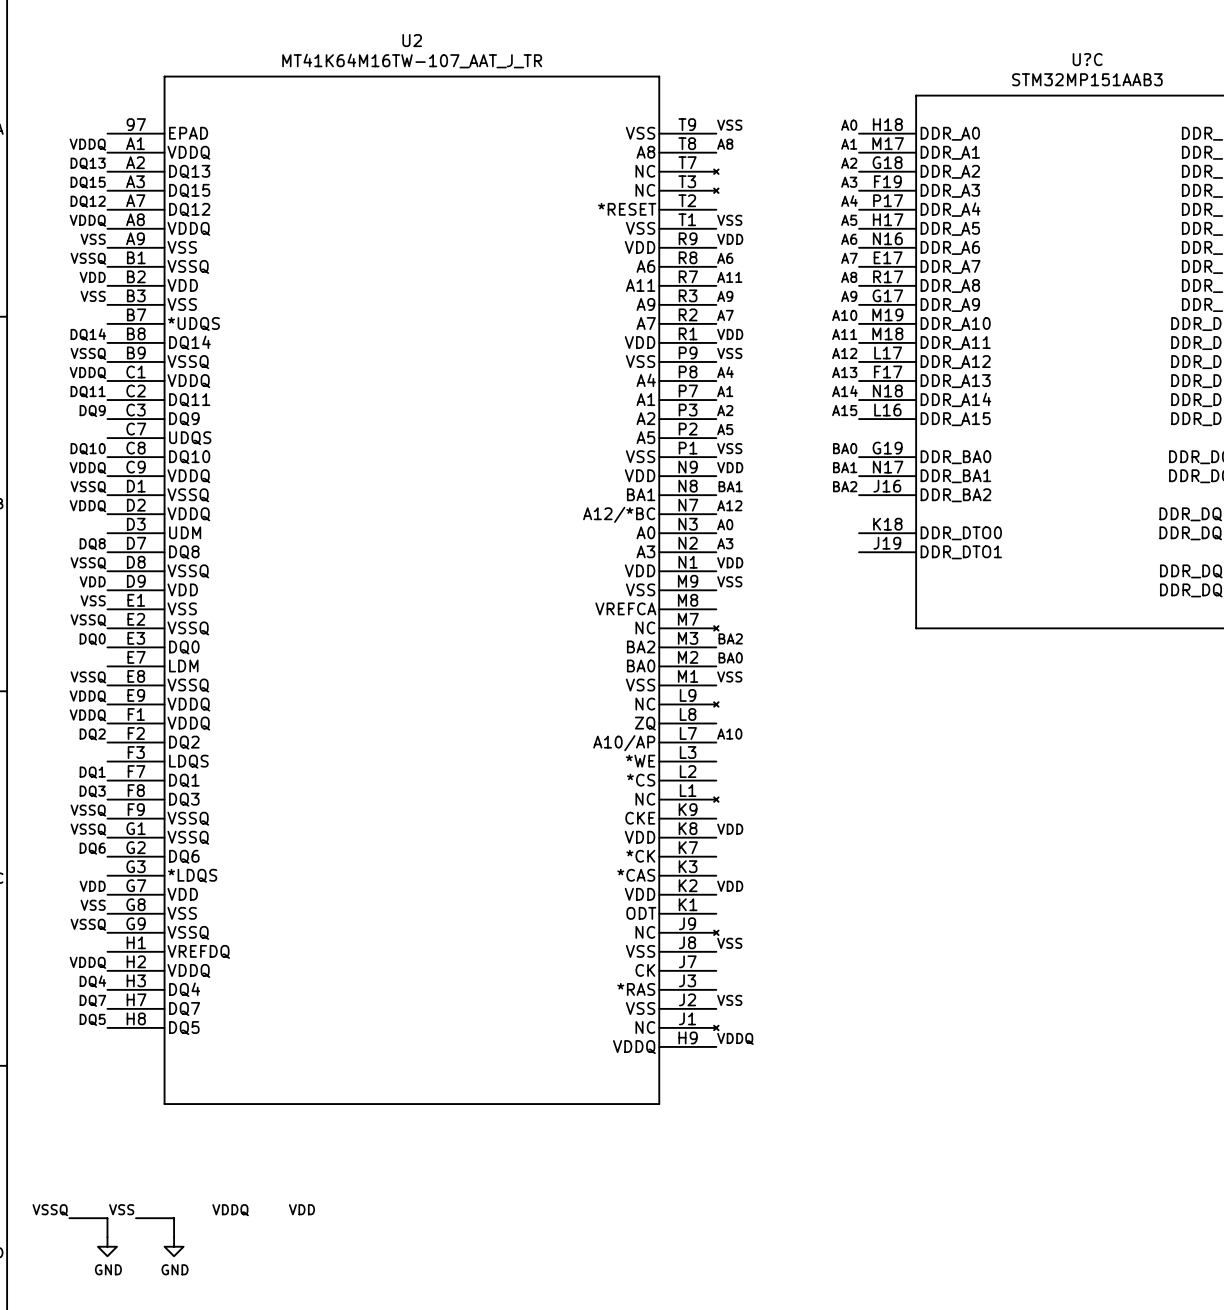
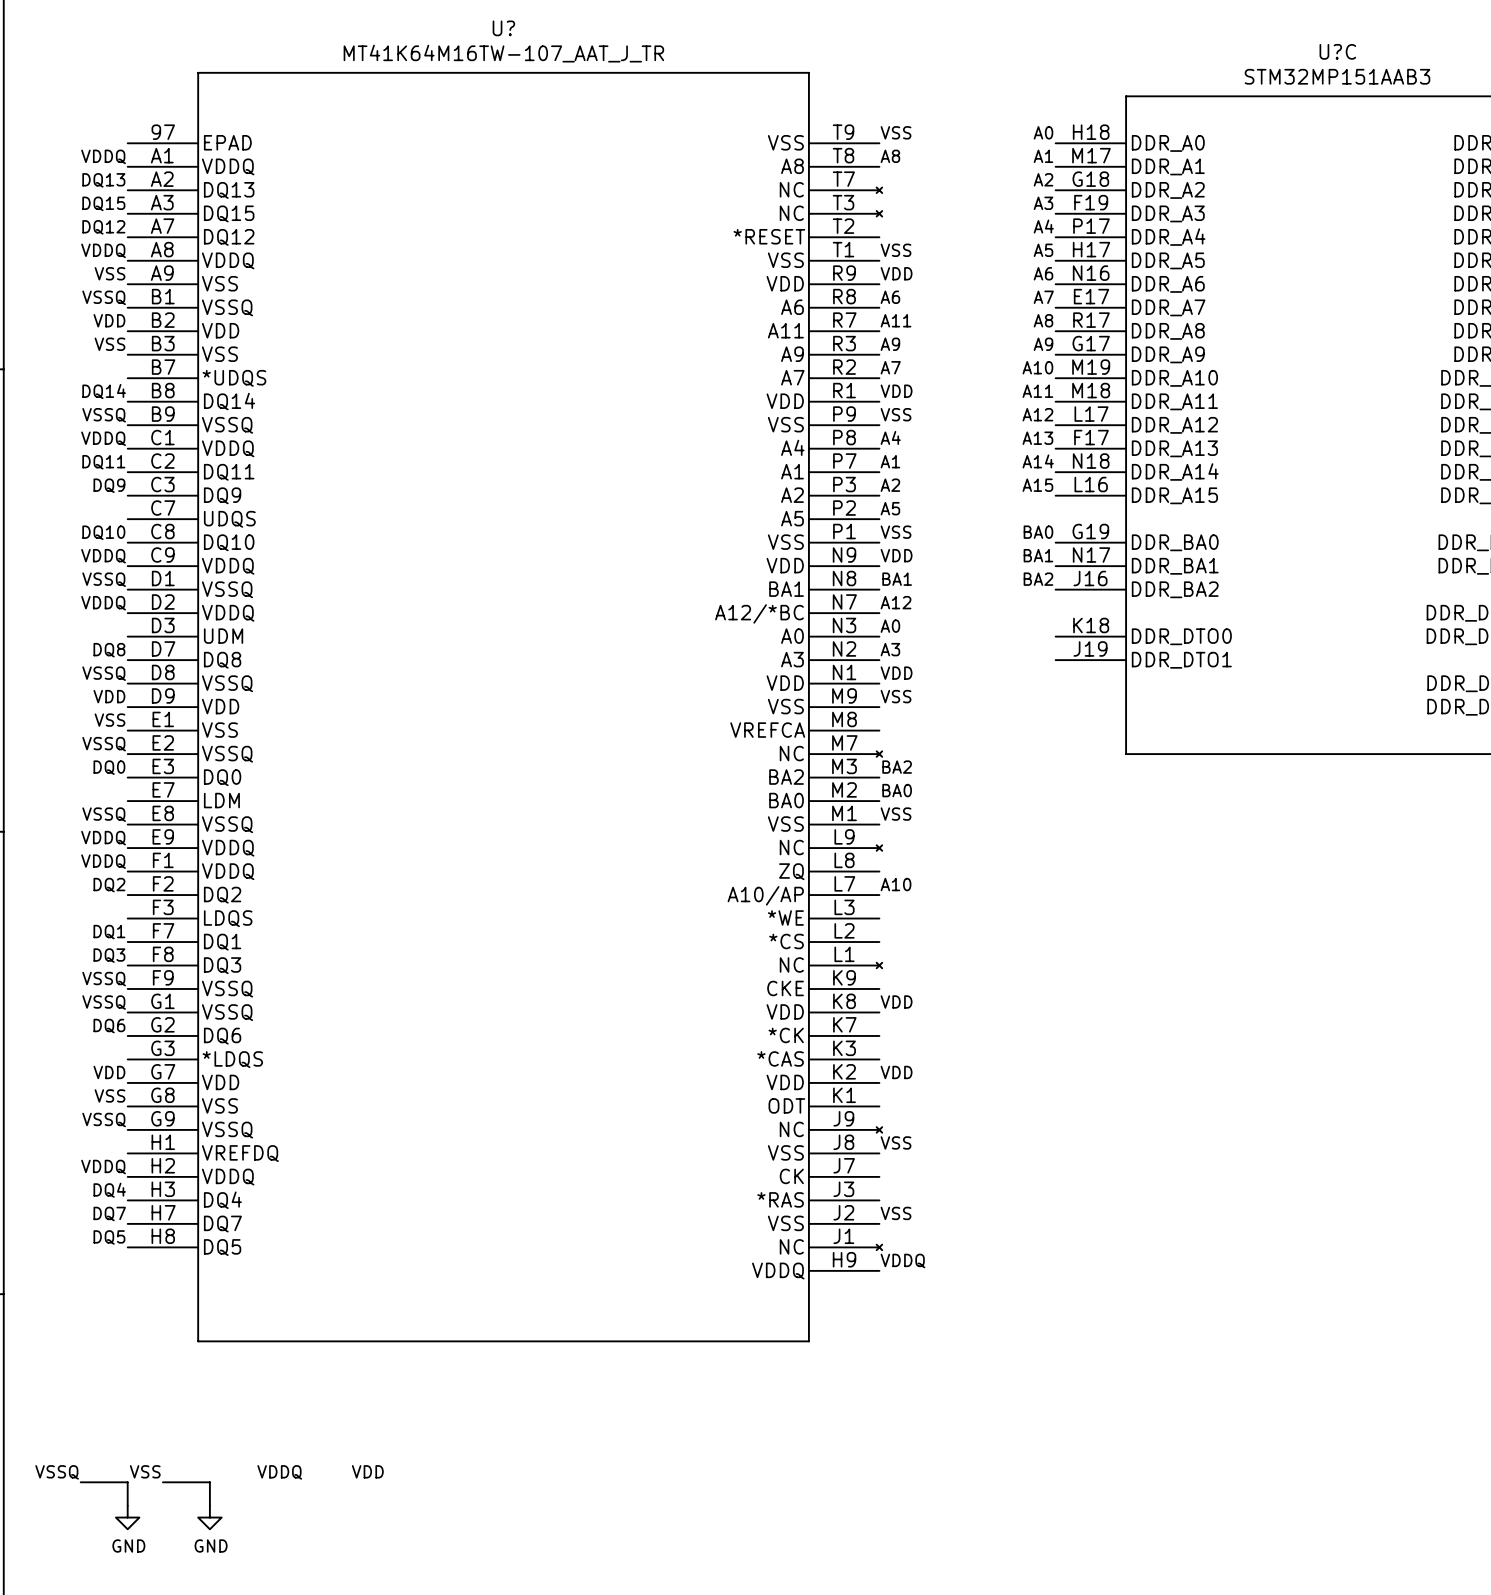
U2 name: U2 (412, 40) -> U? (503, 28)

